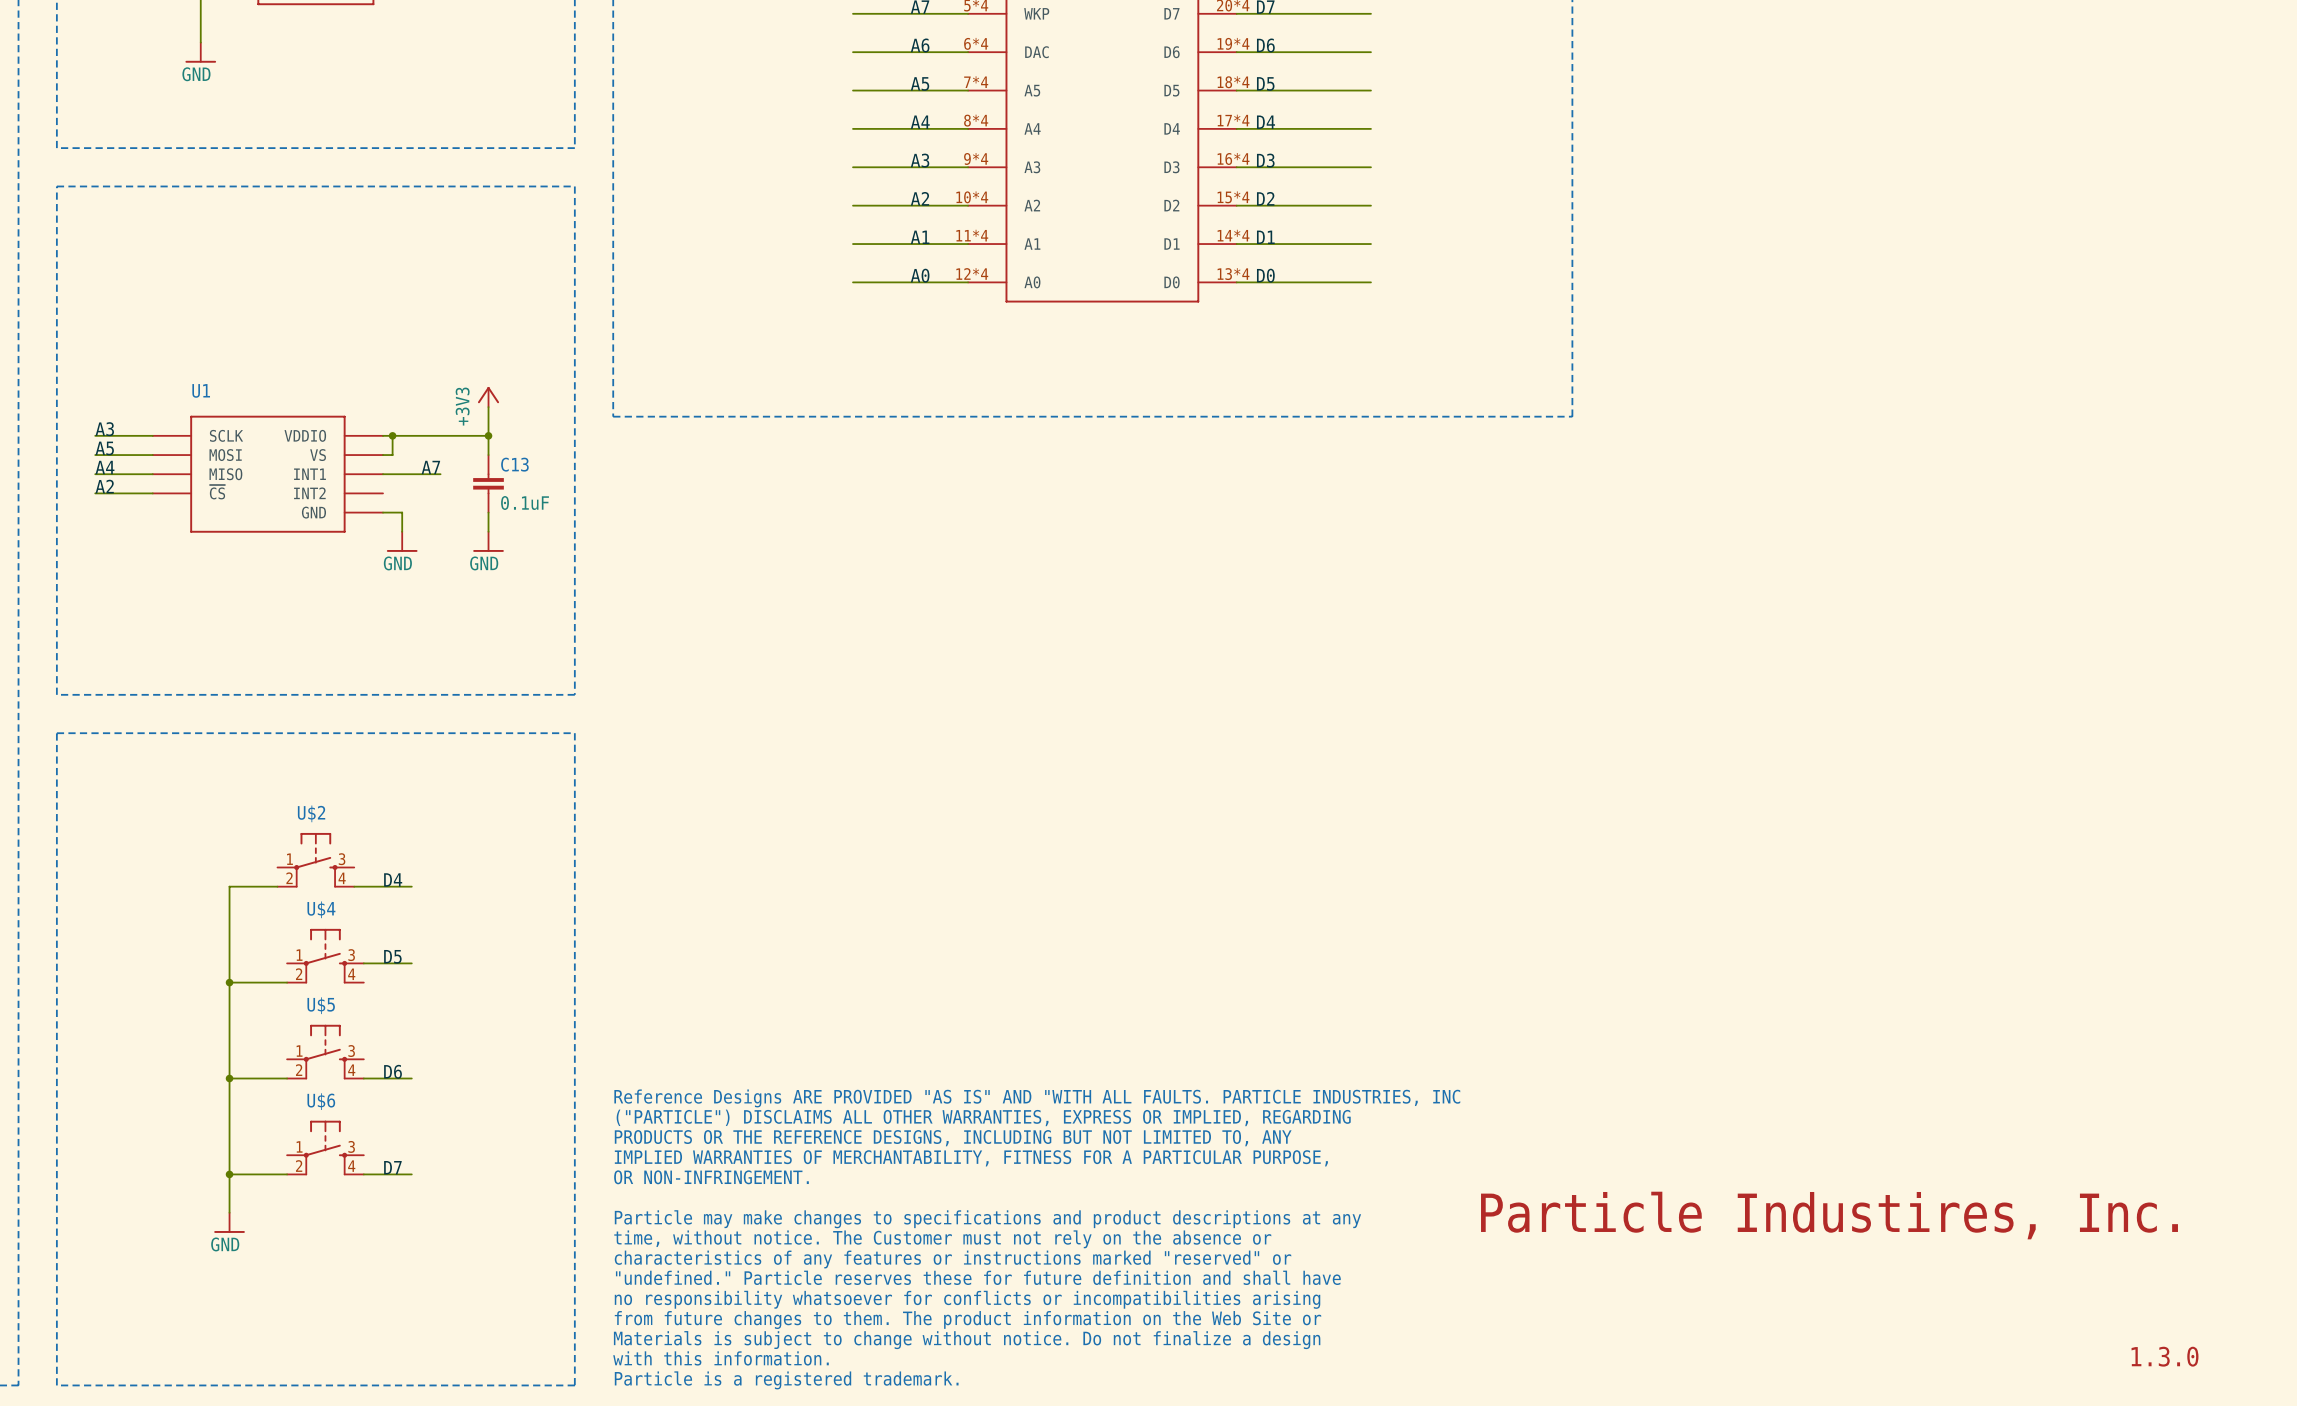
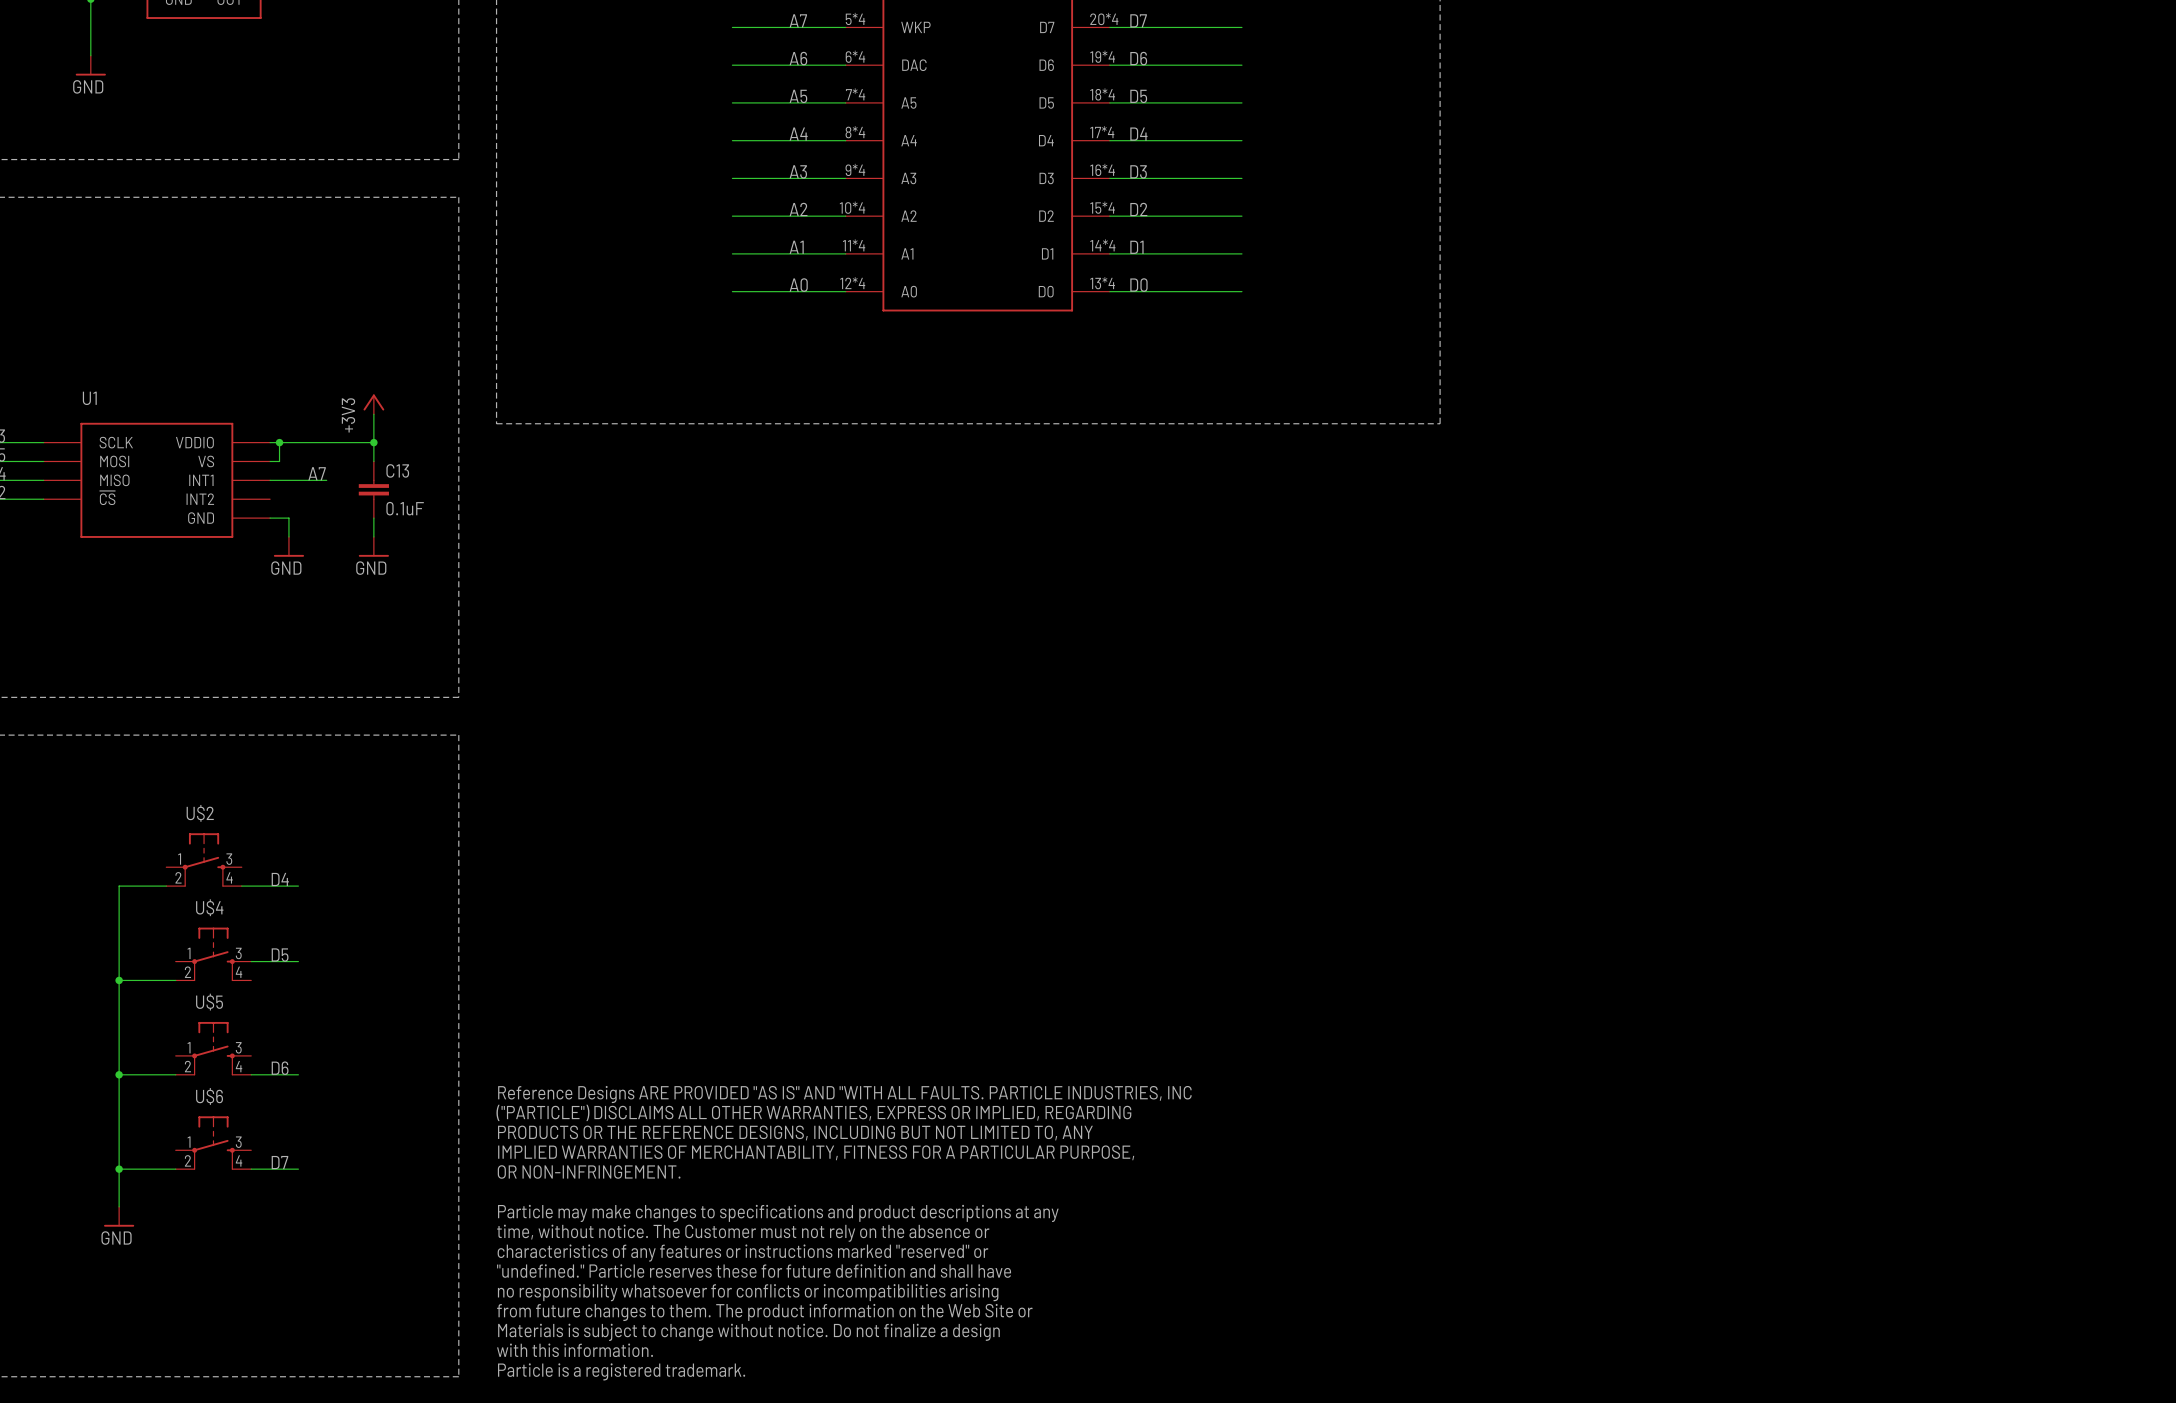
text: Particle Industires, Inc. (1829, 1215) -> none
text: 1.3.0 (2165, 1356) -> none

